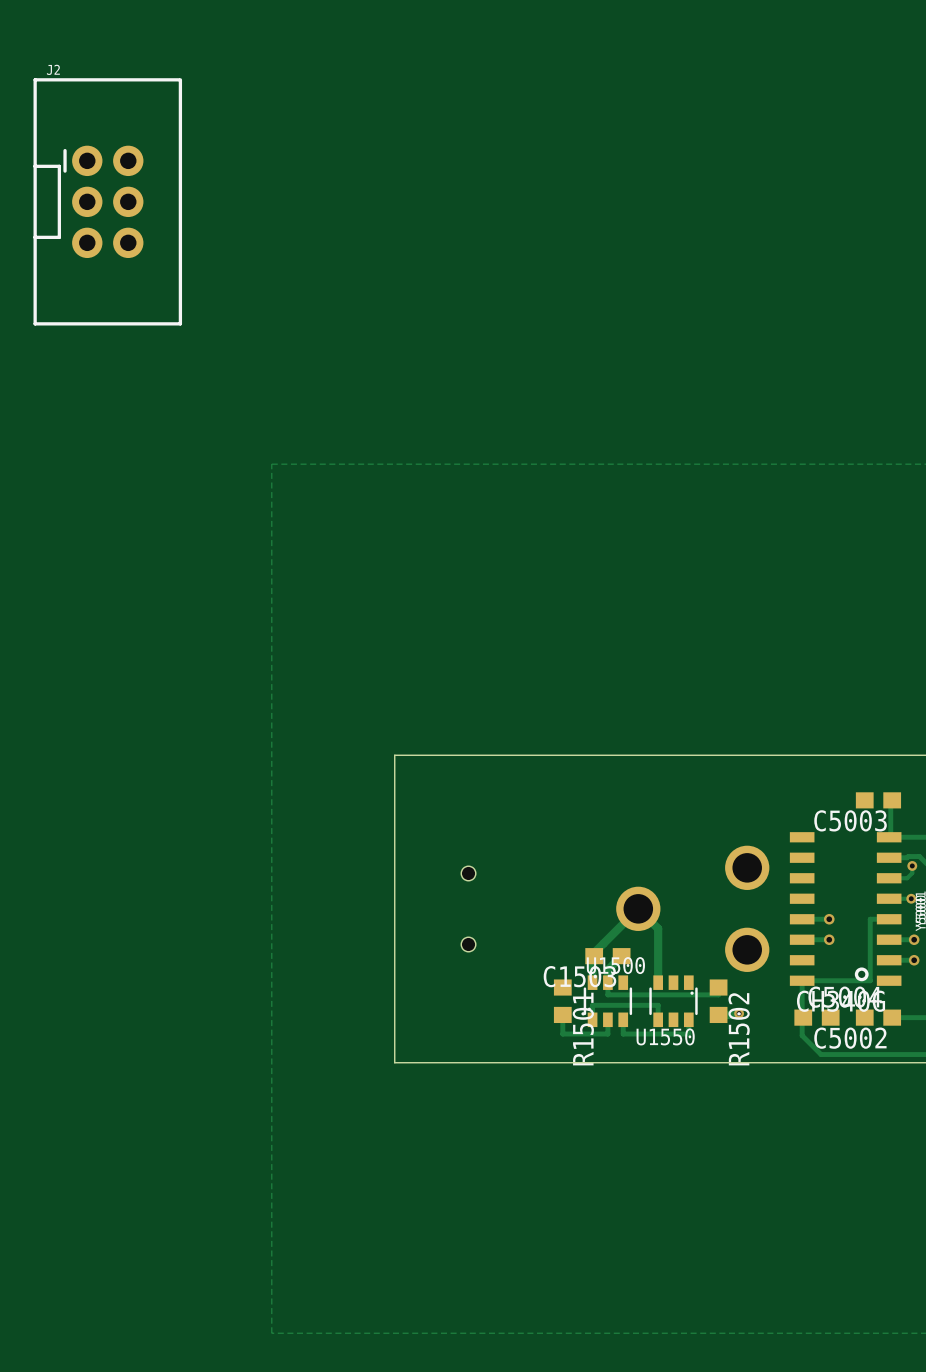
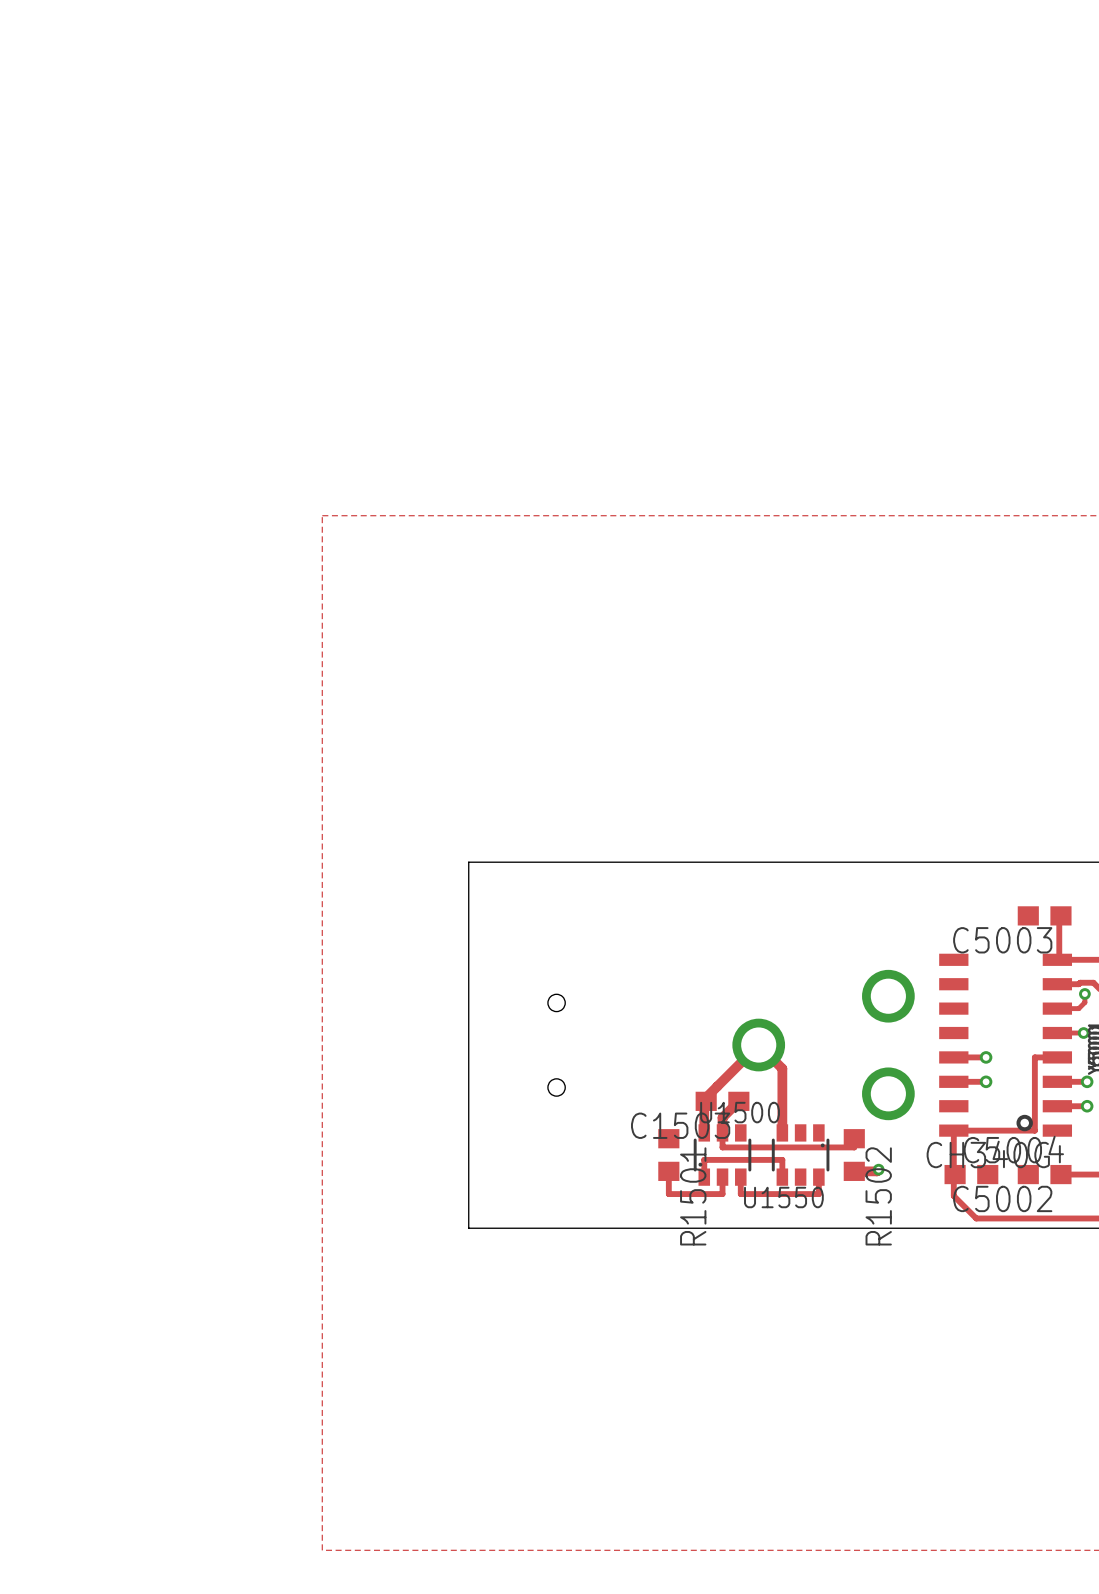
J2: (107, 201) -> none

